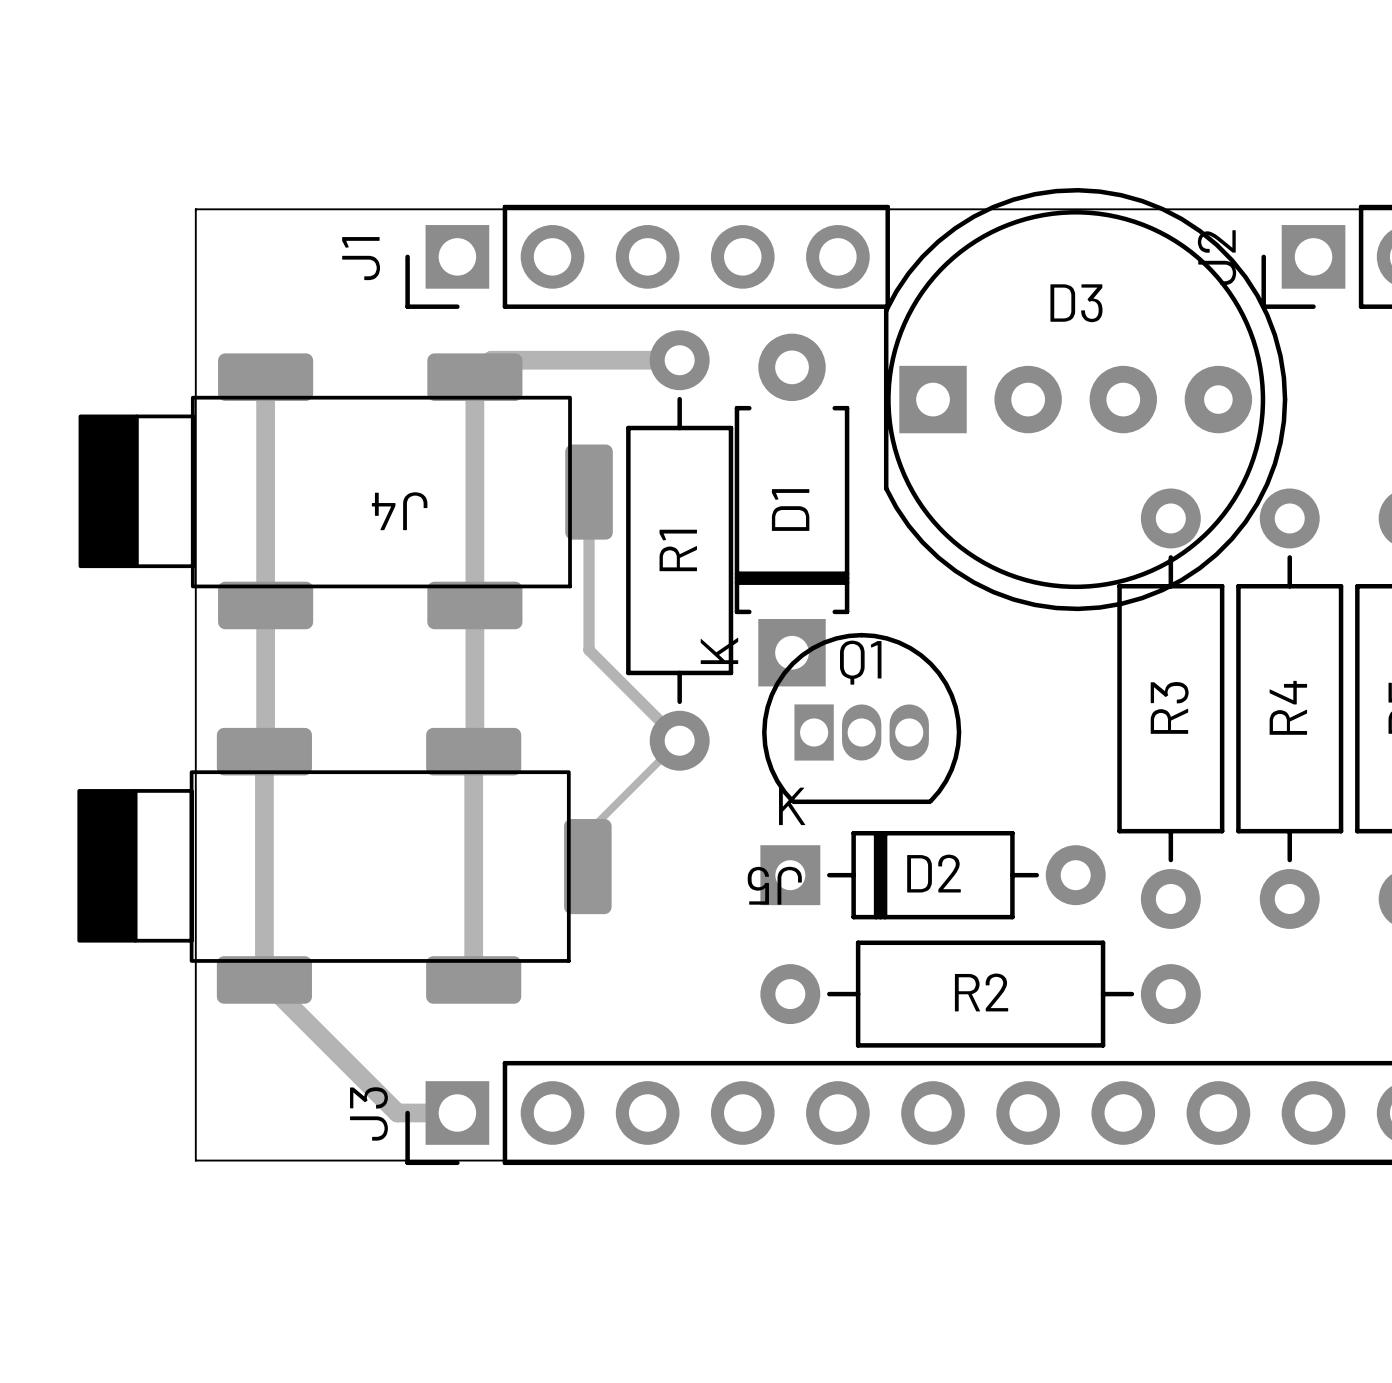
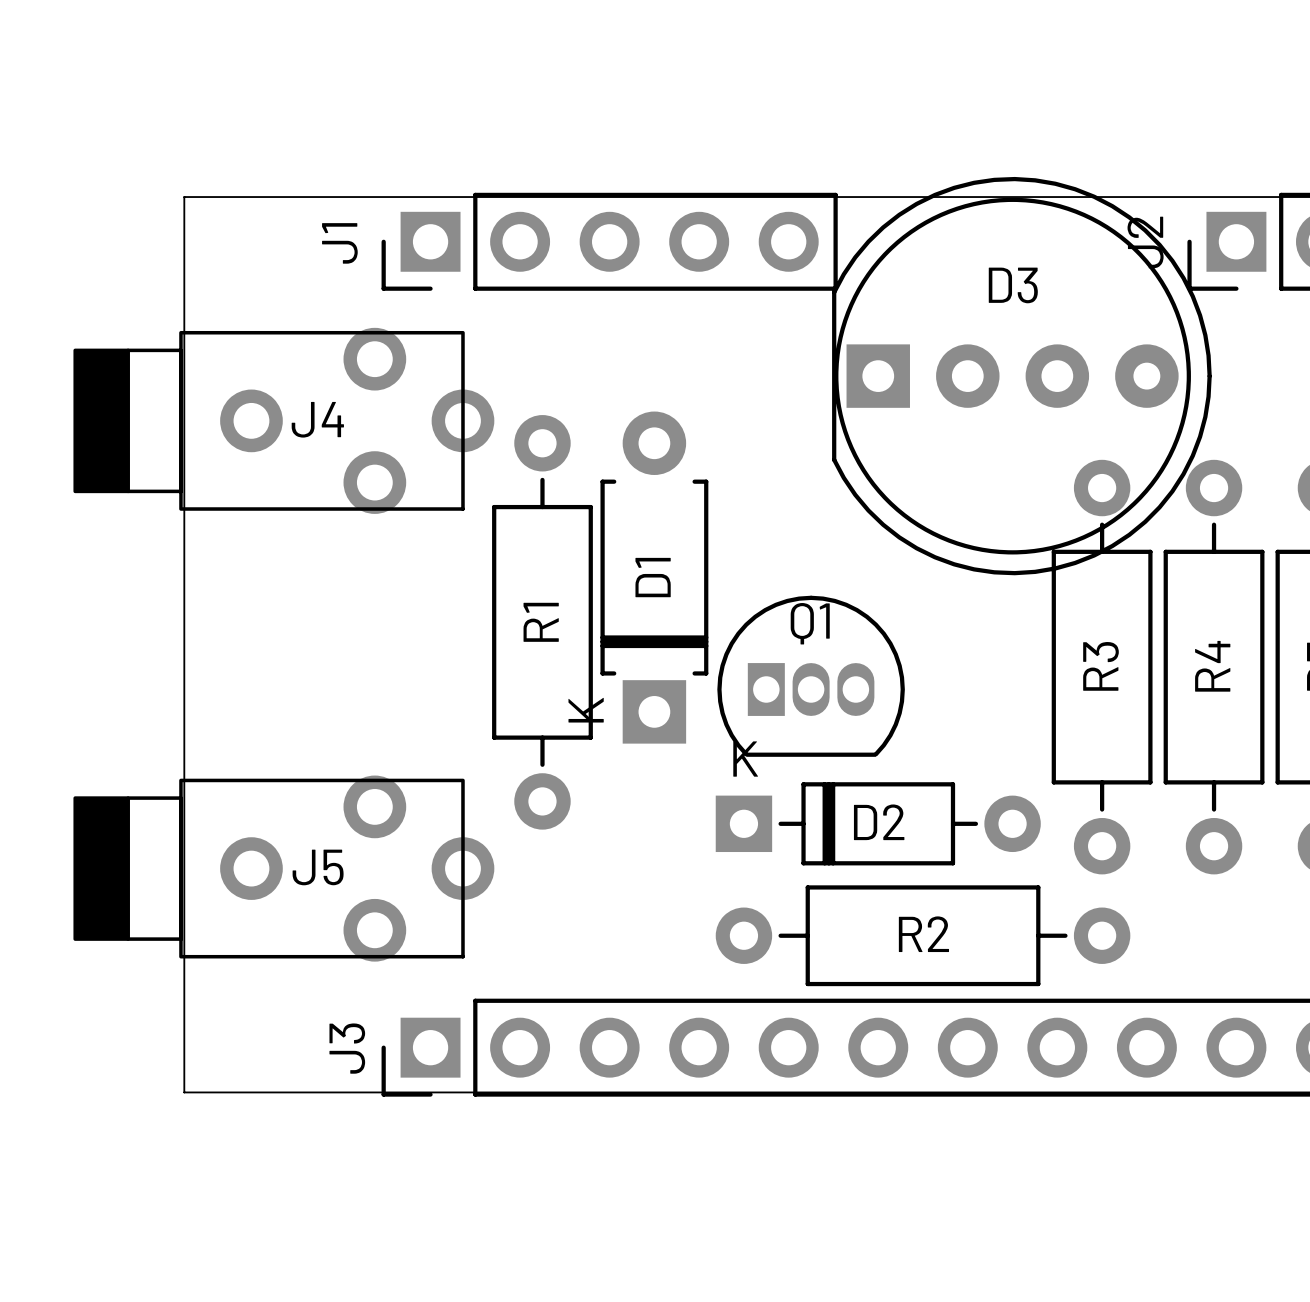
J4 footprint: [78, 353, 613, 630] -> [73, 327, 495, 514]
track: (679, 360) (491, 360) (474, 377) (473, 979) -> none
track: (265, 377) (264, 979) (397, 1112) (457, 1112) -> none
track: (589, 492) (589, 650) (679, 740) (587, 832) (587, 866) -> none
D1 position: (792, 510) -> (654, 577)
R1 position: (679, 550) -> (542, 622)
J5 footprint: [77, 727, 612, 1004] -> [73, 775, 495, 962]
J5 name position: J5 (774, 885) -> J5 (318, 867)

